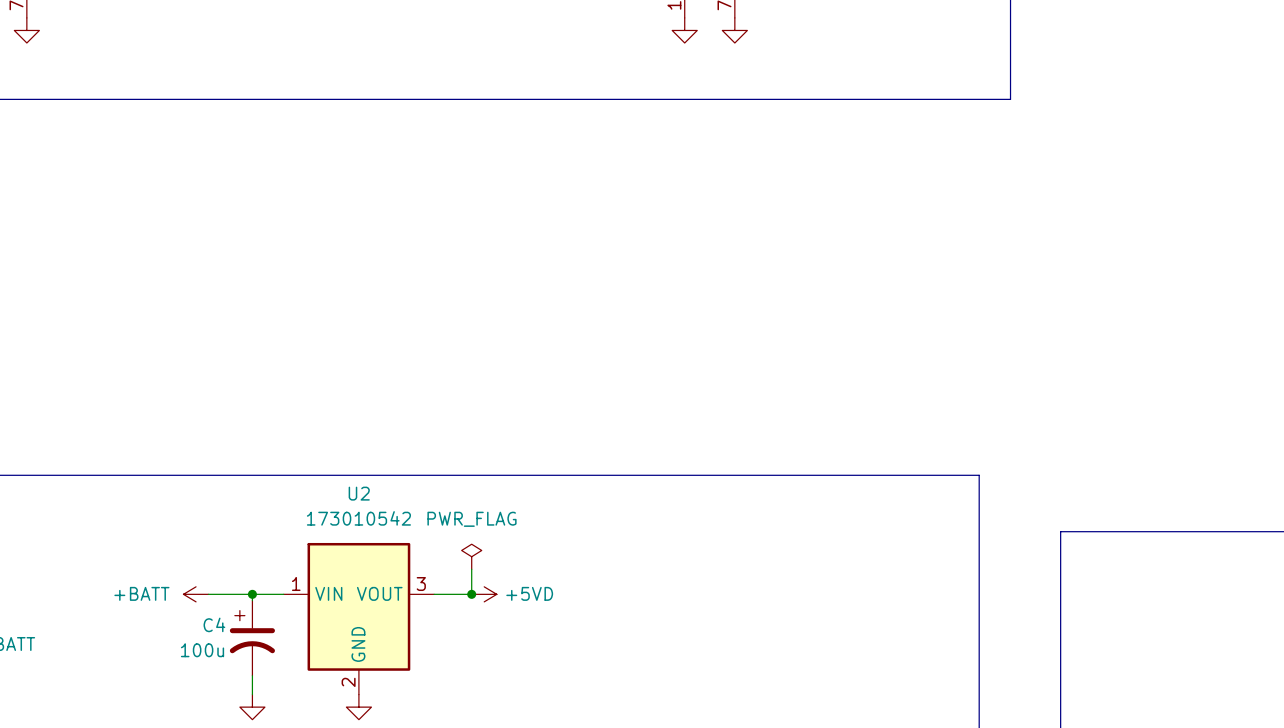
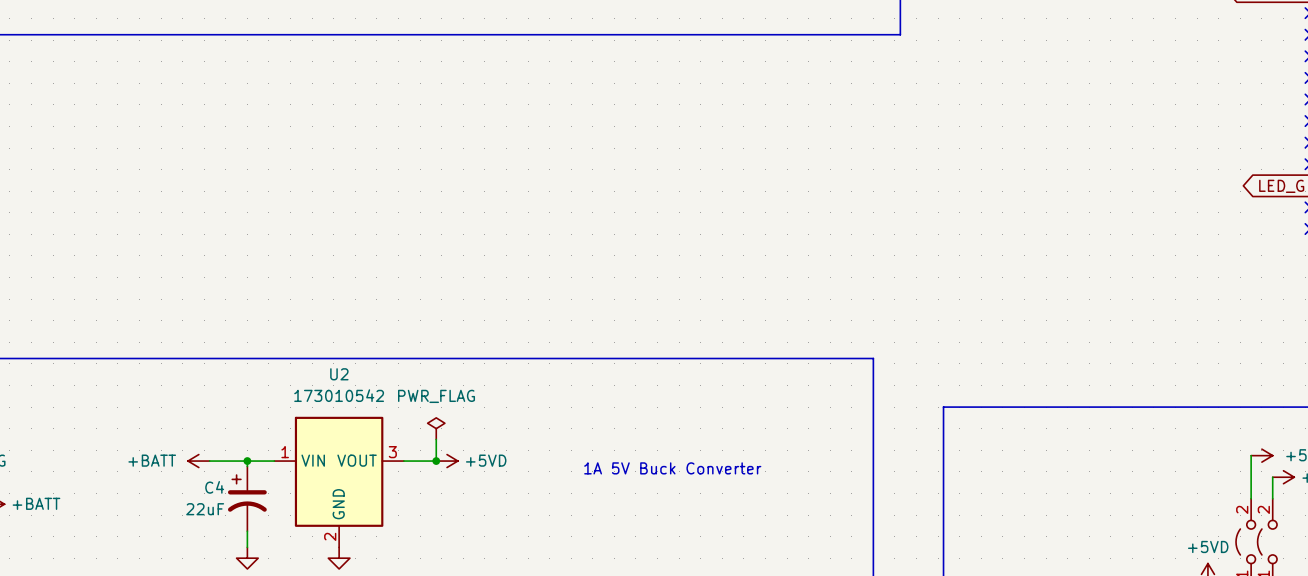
text: none -> 1A 5V Buck Converter (672, 468)
C4 value: 100u (202, 650) -> 22uF (205, 509)

